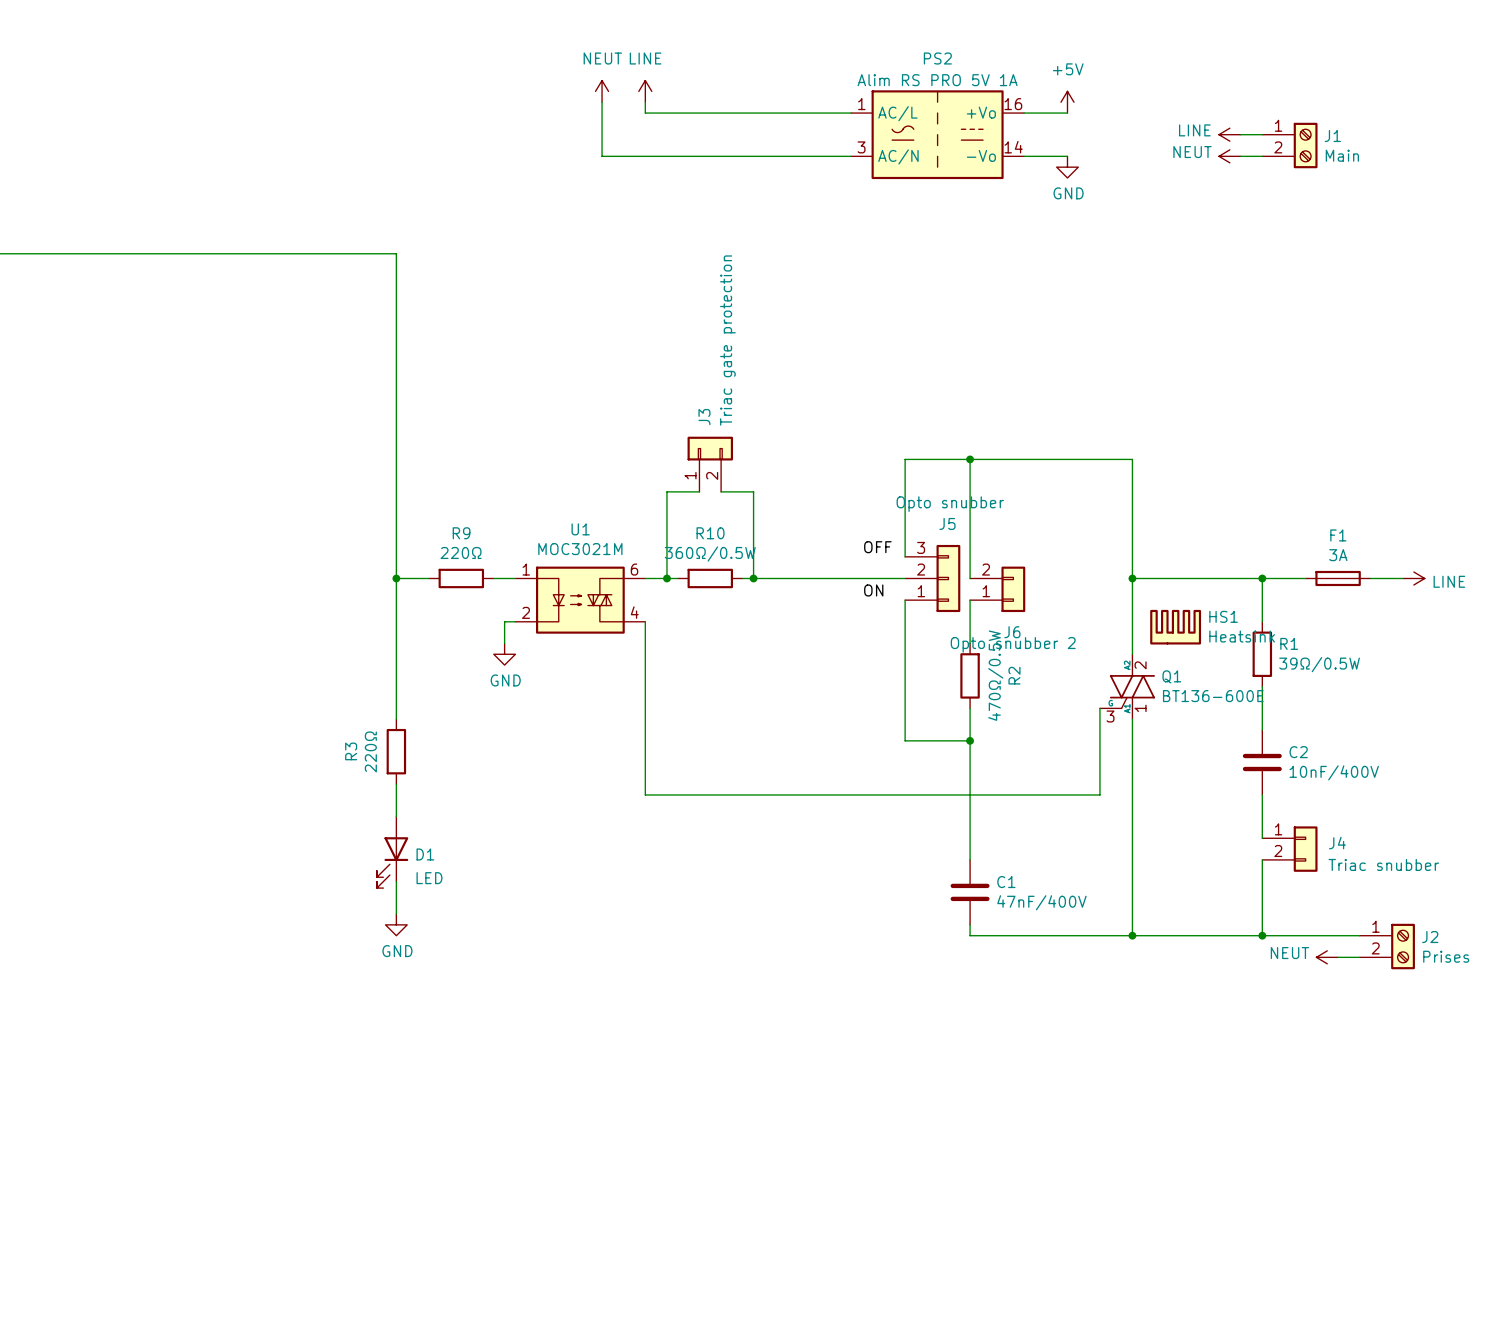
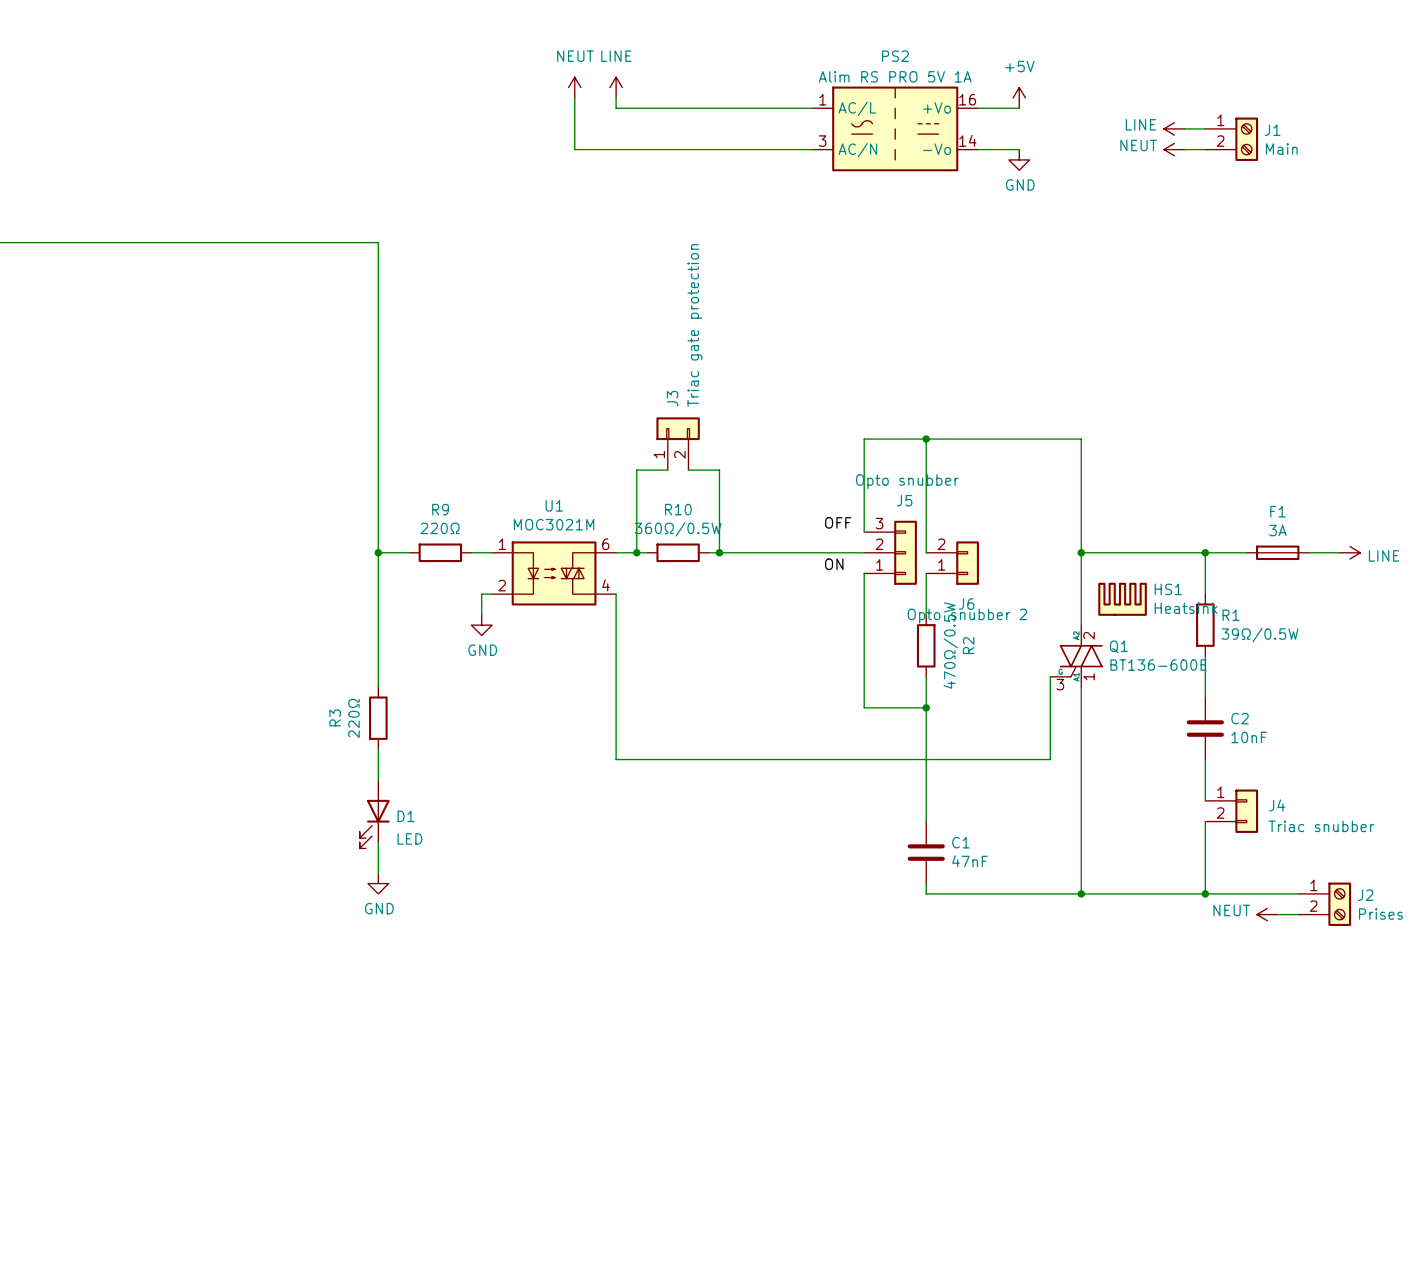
C2 value: 10nF/400V (1334, 772) -> 10nF (1249, 737)
C1 value: 47nF/400V (1041, 902) -> 47nF (970, 861)

